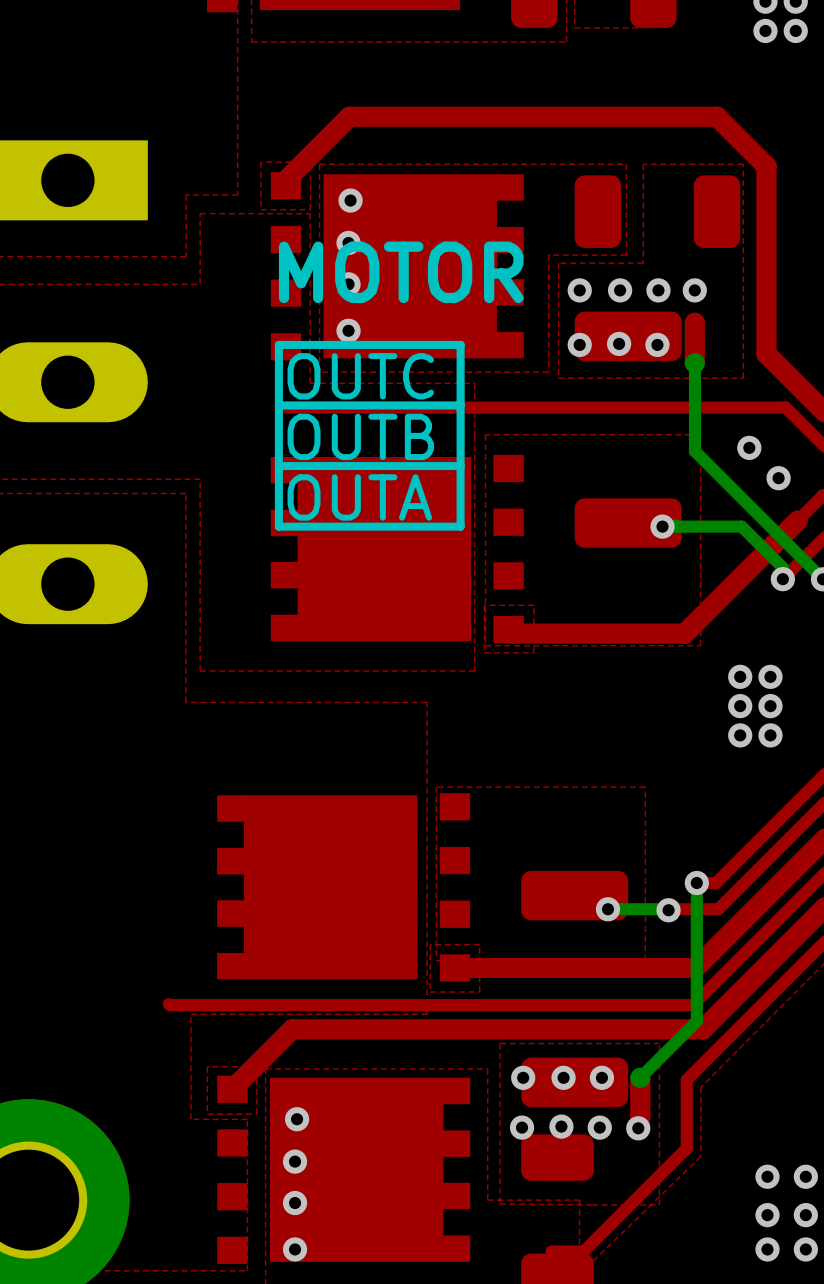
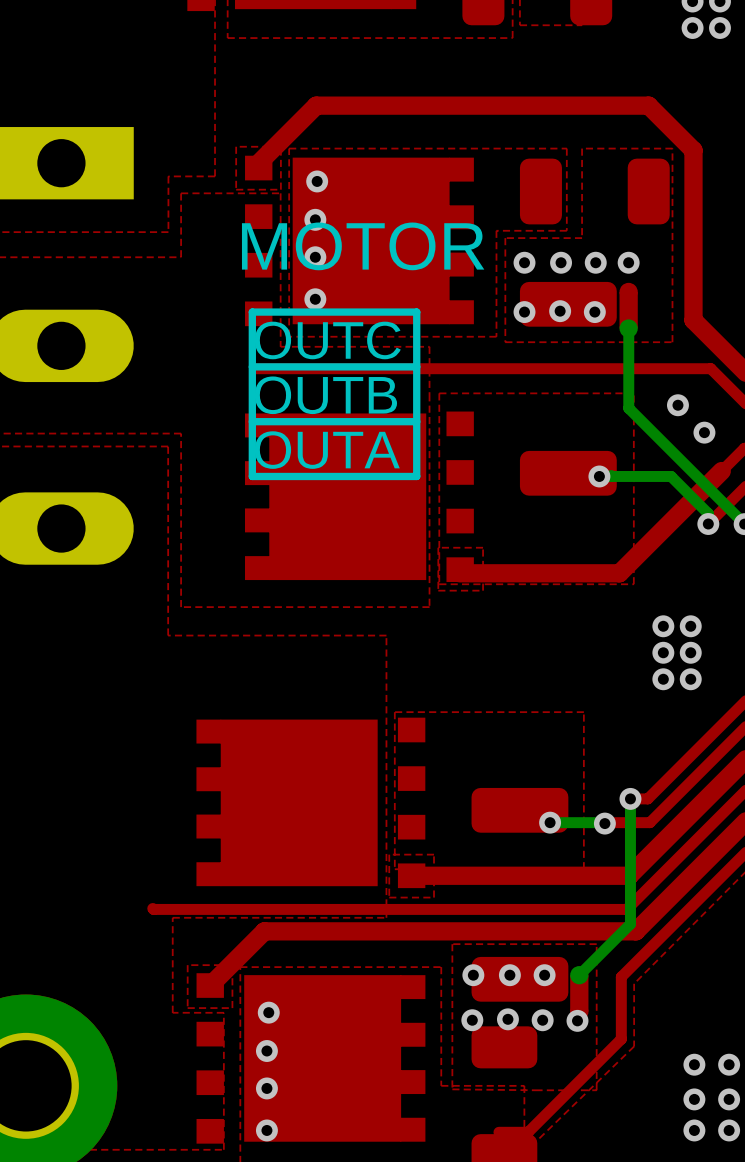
via: (740, 676) -> none
via: (770, 676) -> none
via: none -> (663, 626)
via: none -> (690, 626)
via: (740, 706) -> none
via: (770, 706) -> none
via: none -> (663, 652)
via: none -> (690, 652)
via: (740, 735) -> none
via: (770, 735) -> none
via: none -> (663, 679)
via: none -> (690, 679)

